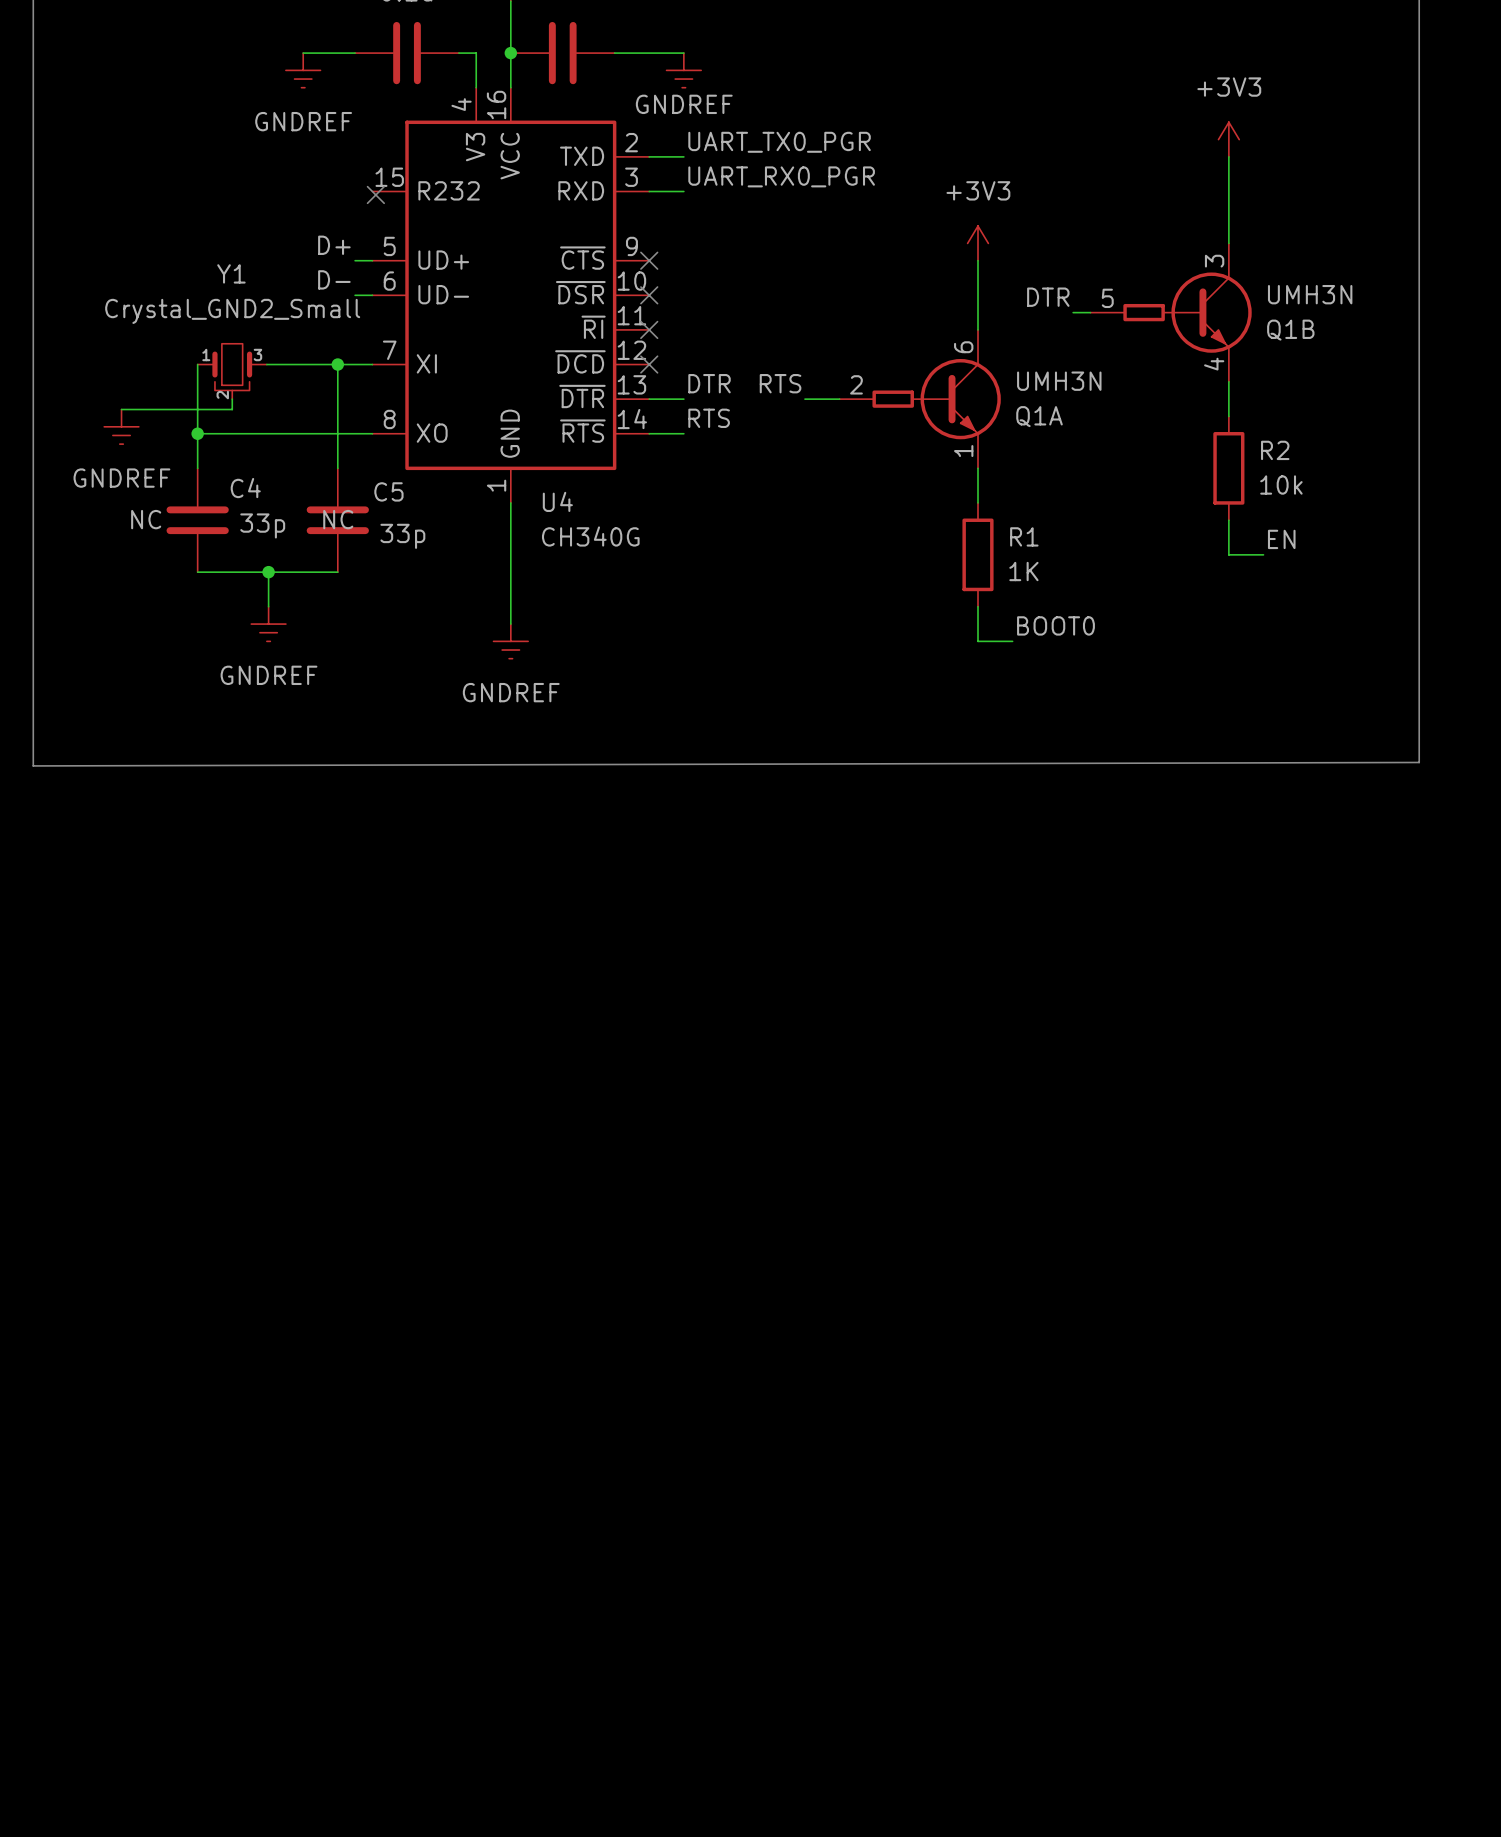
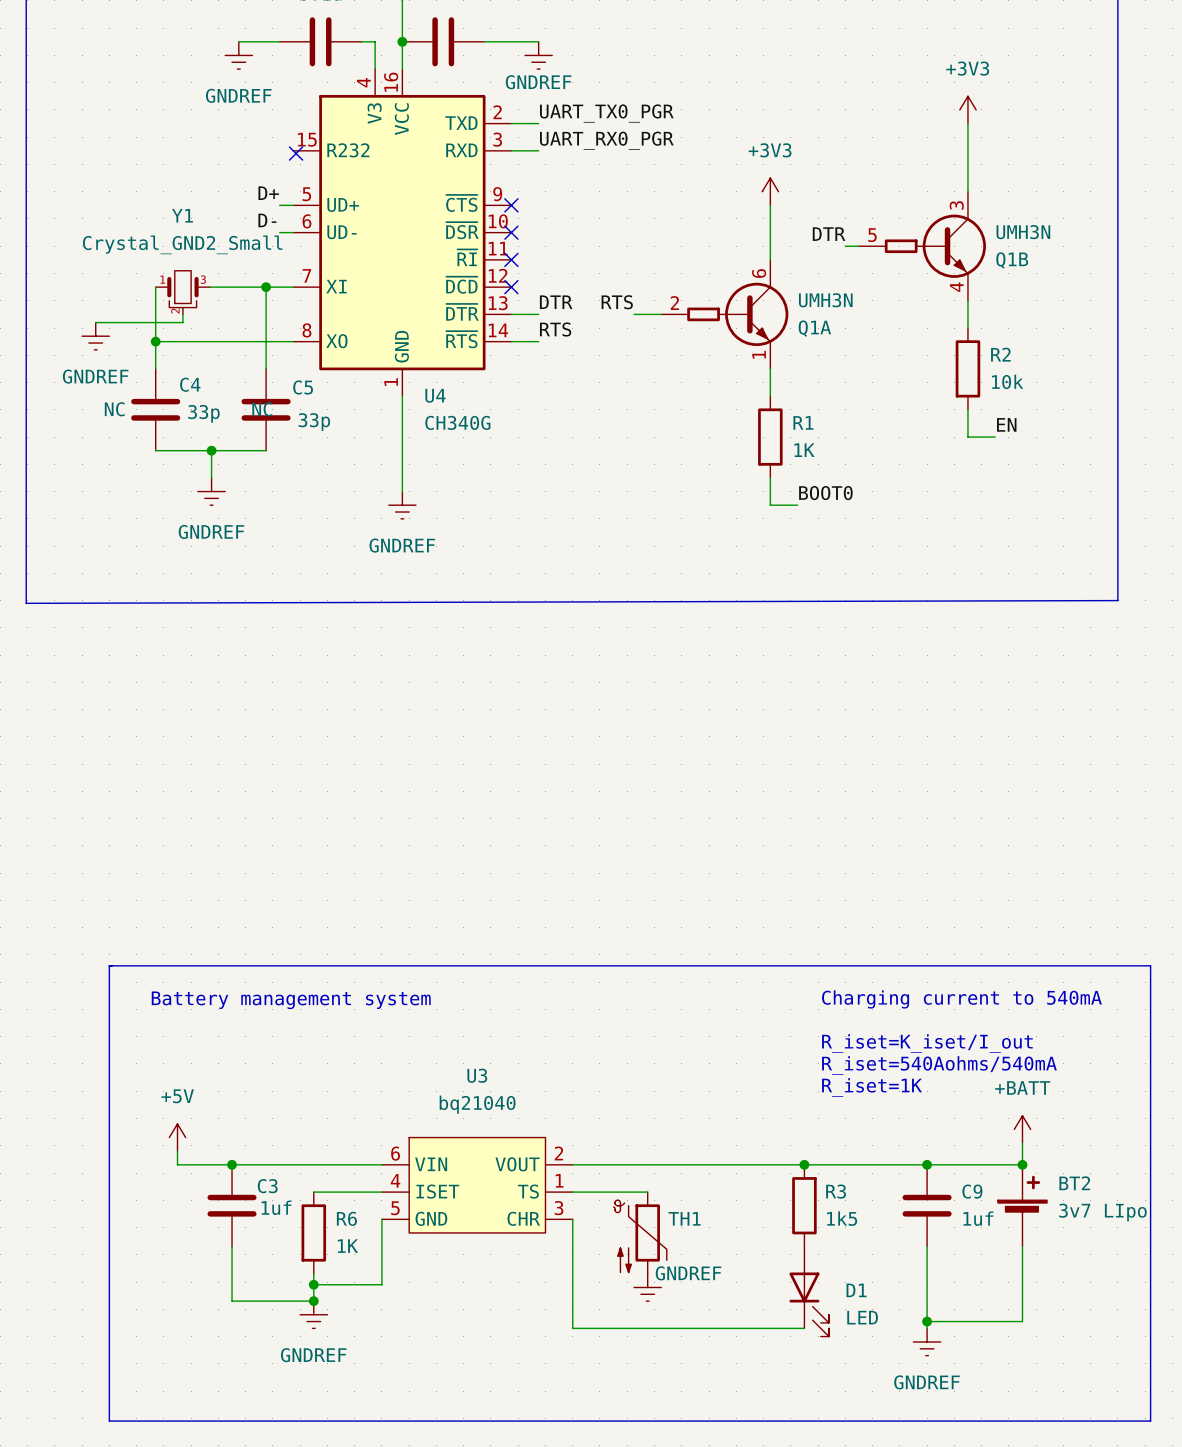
line: none -> (109, 965) (1150, 965) (1150, 1421) (109, 1421) (109, 965)
text: none -> Charging current to 540mA (961, 999)
text: none -> Battery management system (291, 1000)
text: none -> R_iset=K_iset/I_out (927, 1043)
text: none -> R_iset=540Aohms/540mA (939, 1065)
text: none -> R_iset=1K (872, 1087)
power symbol: none -> +BATT (1022, 1129)
power symbol: none -> +5V (177, 1137)
wire: none -> (1022, 1143) (1022, 1164) (572, 1164)
wire: none -> (177, 1151) (177, 1164) (381, 1164)
junction: none -> (232, 1164)
junction: none -> (804, 1164)
junction: none -> (927, 1164)
junction: none -> (1022, 1164)
U3: none -> bq21040 (477, 1185)
wire: none -> (313, 1192) (381, 1192)
wire: none -> (572, 1192) (647, 1192)
C3: none -> 1uf (232, 1205)
R3: none -> 1k5 (804, 1205)
C9: none -> 1uf (927, 1205)
BT2: none -> 3v7 LIpo (1022, 1205)
wire: none -> (381, 1219) (381, 1284) (313, 1284)
wire: none -> (572, 1219) (572, 1328) (804, 1328)
R6: none -> 1K (313, 1232)
TH1: none -> (640, 1232)
wire: none -> (232, 1246) (232, 1301) (313, 1301) (313, 1273)
wire: none -> (927, 1246) (927, 1328)
wire: none -> (1022, 1246) (1022, 1321) (927, 1321)
junction: none -> (313, 1284)
power symbol: none -> GNDREF (647, 1287)
D1: none -> LED (809, 1291)
junction: none -> (313, 1301)
power symbol: none -> GNDREF (313, 1314)
junction: none -> (927, 1321)
power symbol: none -> GNDREF (927, 1342)

